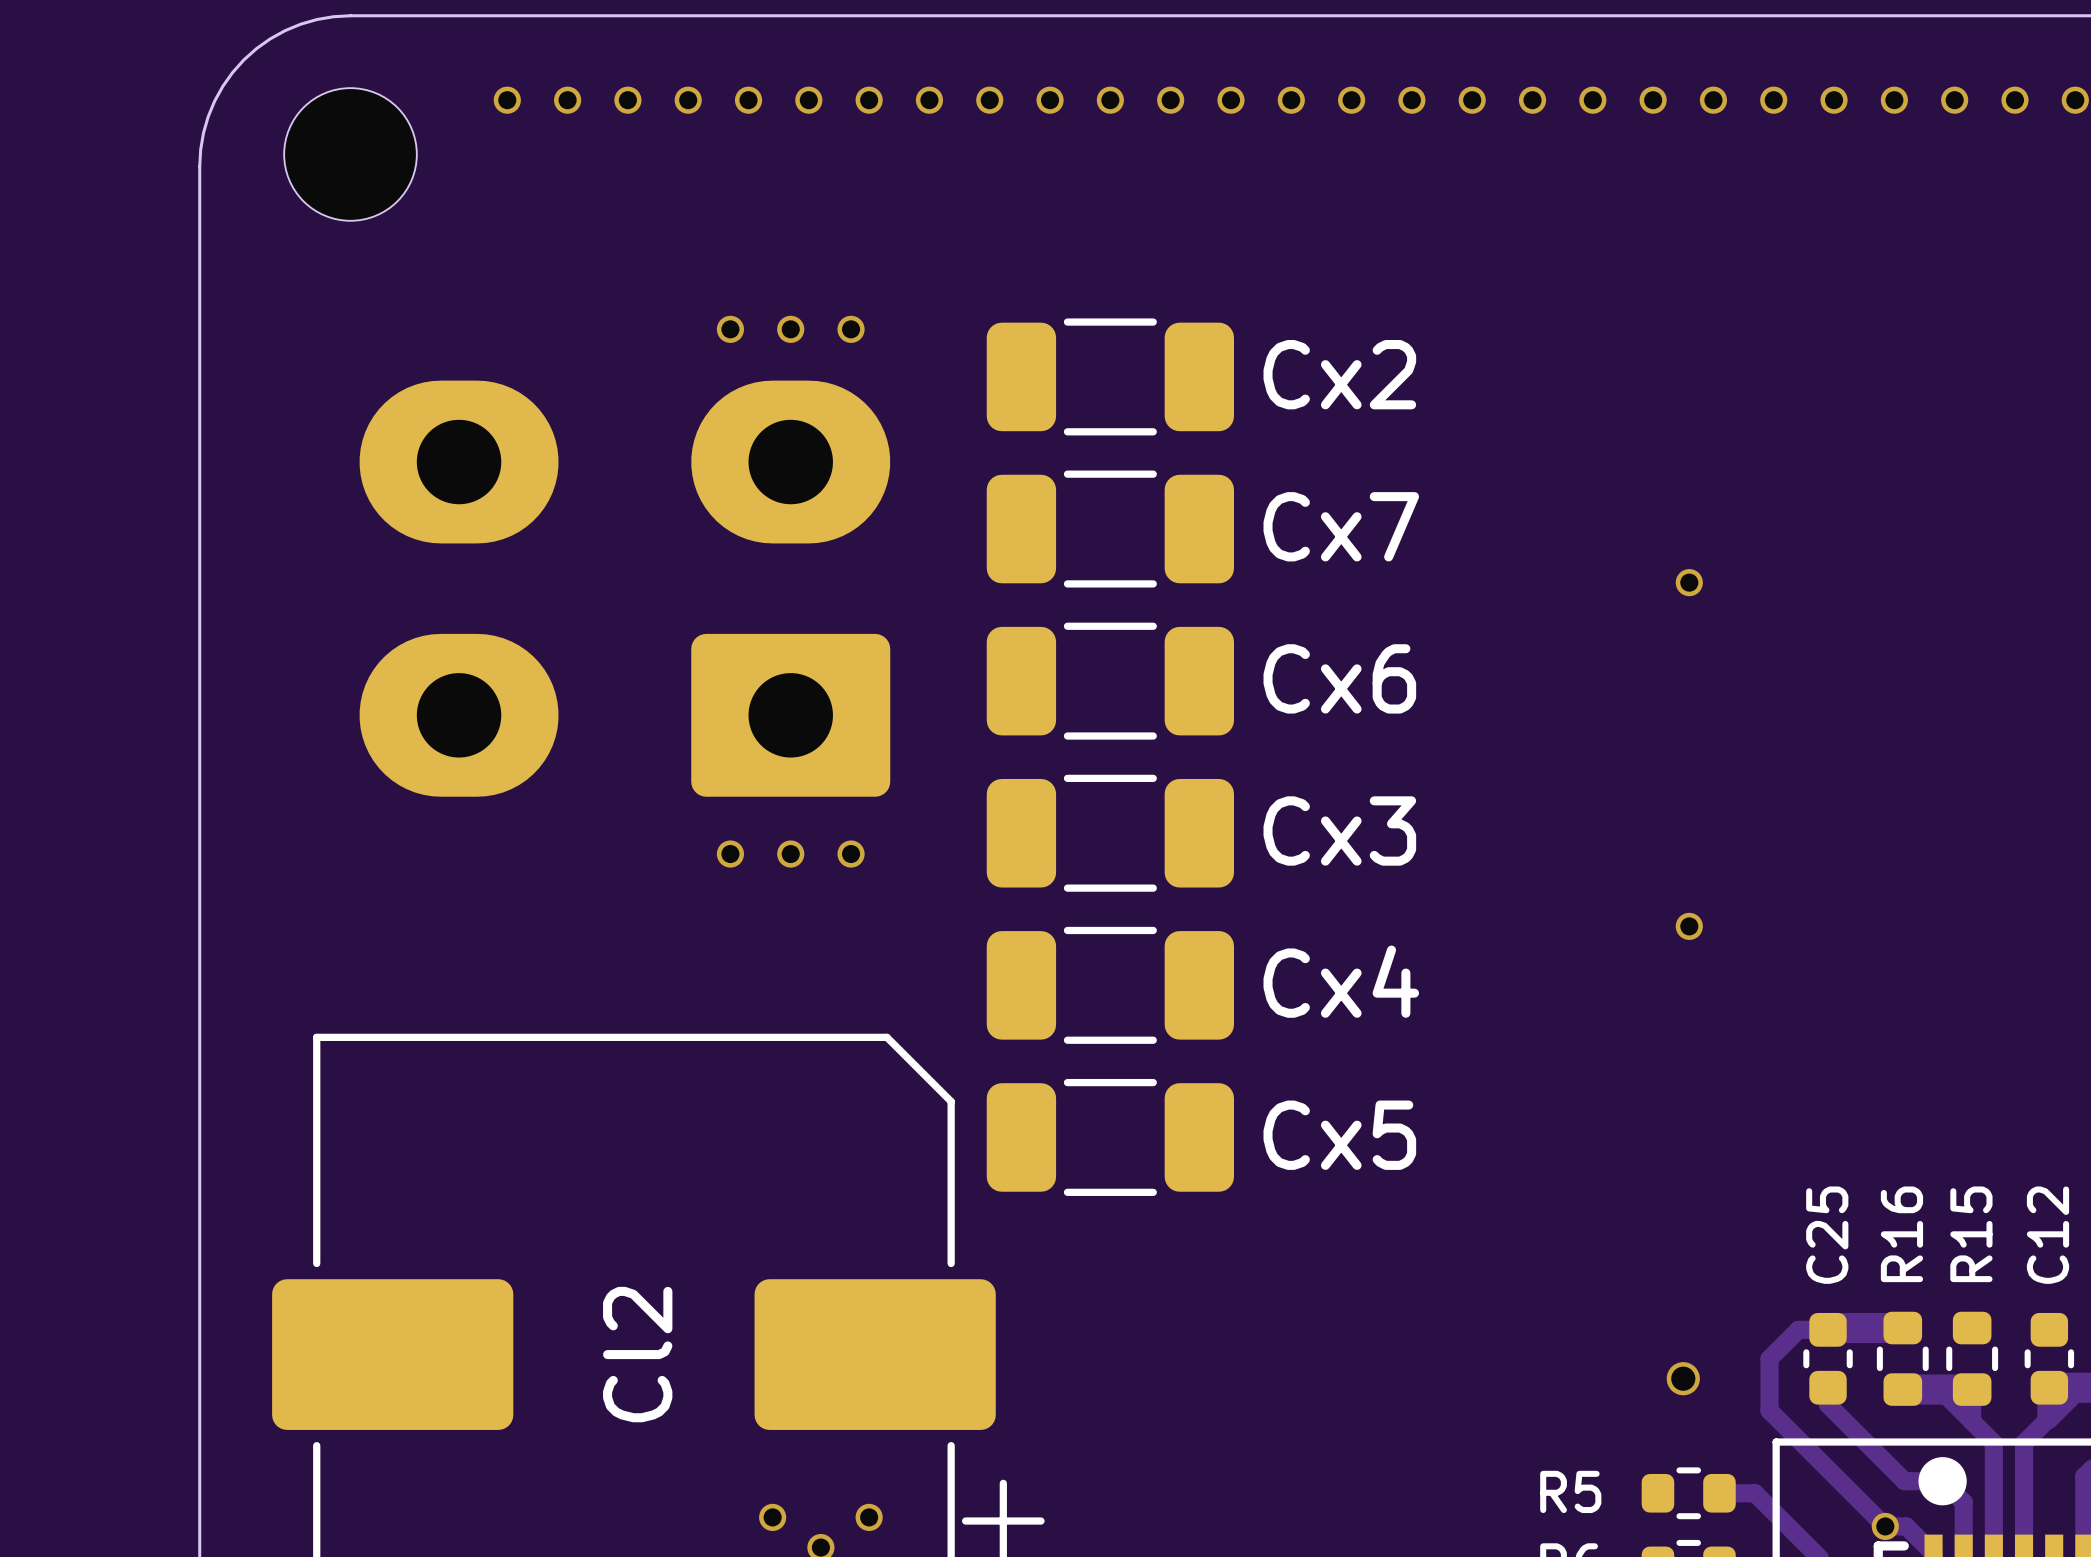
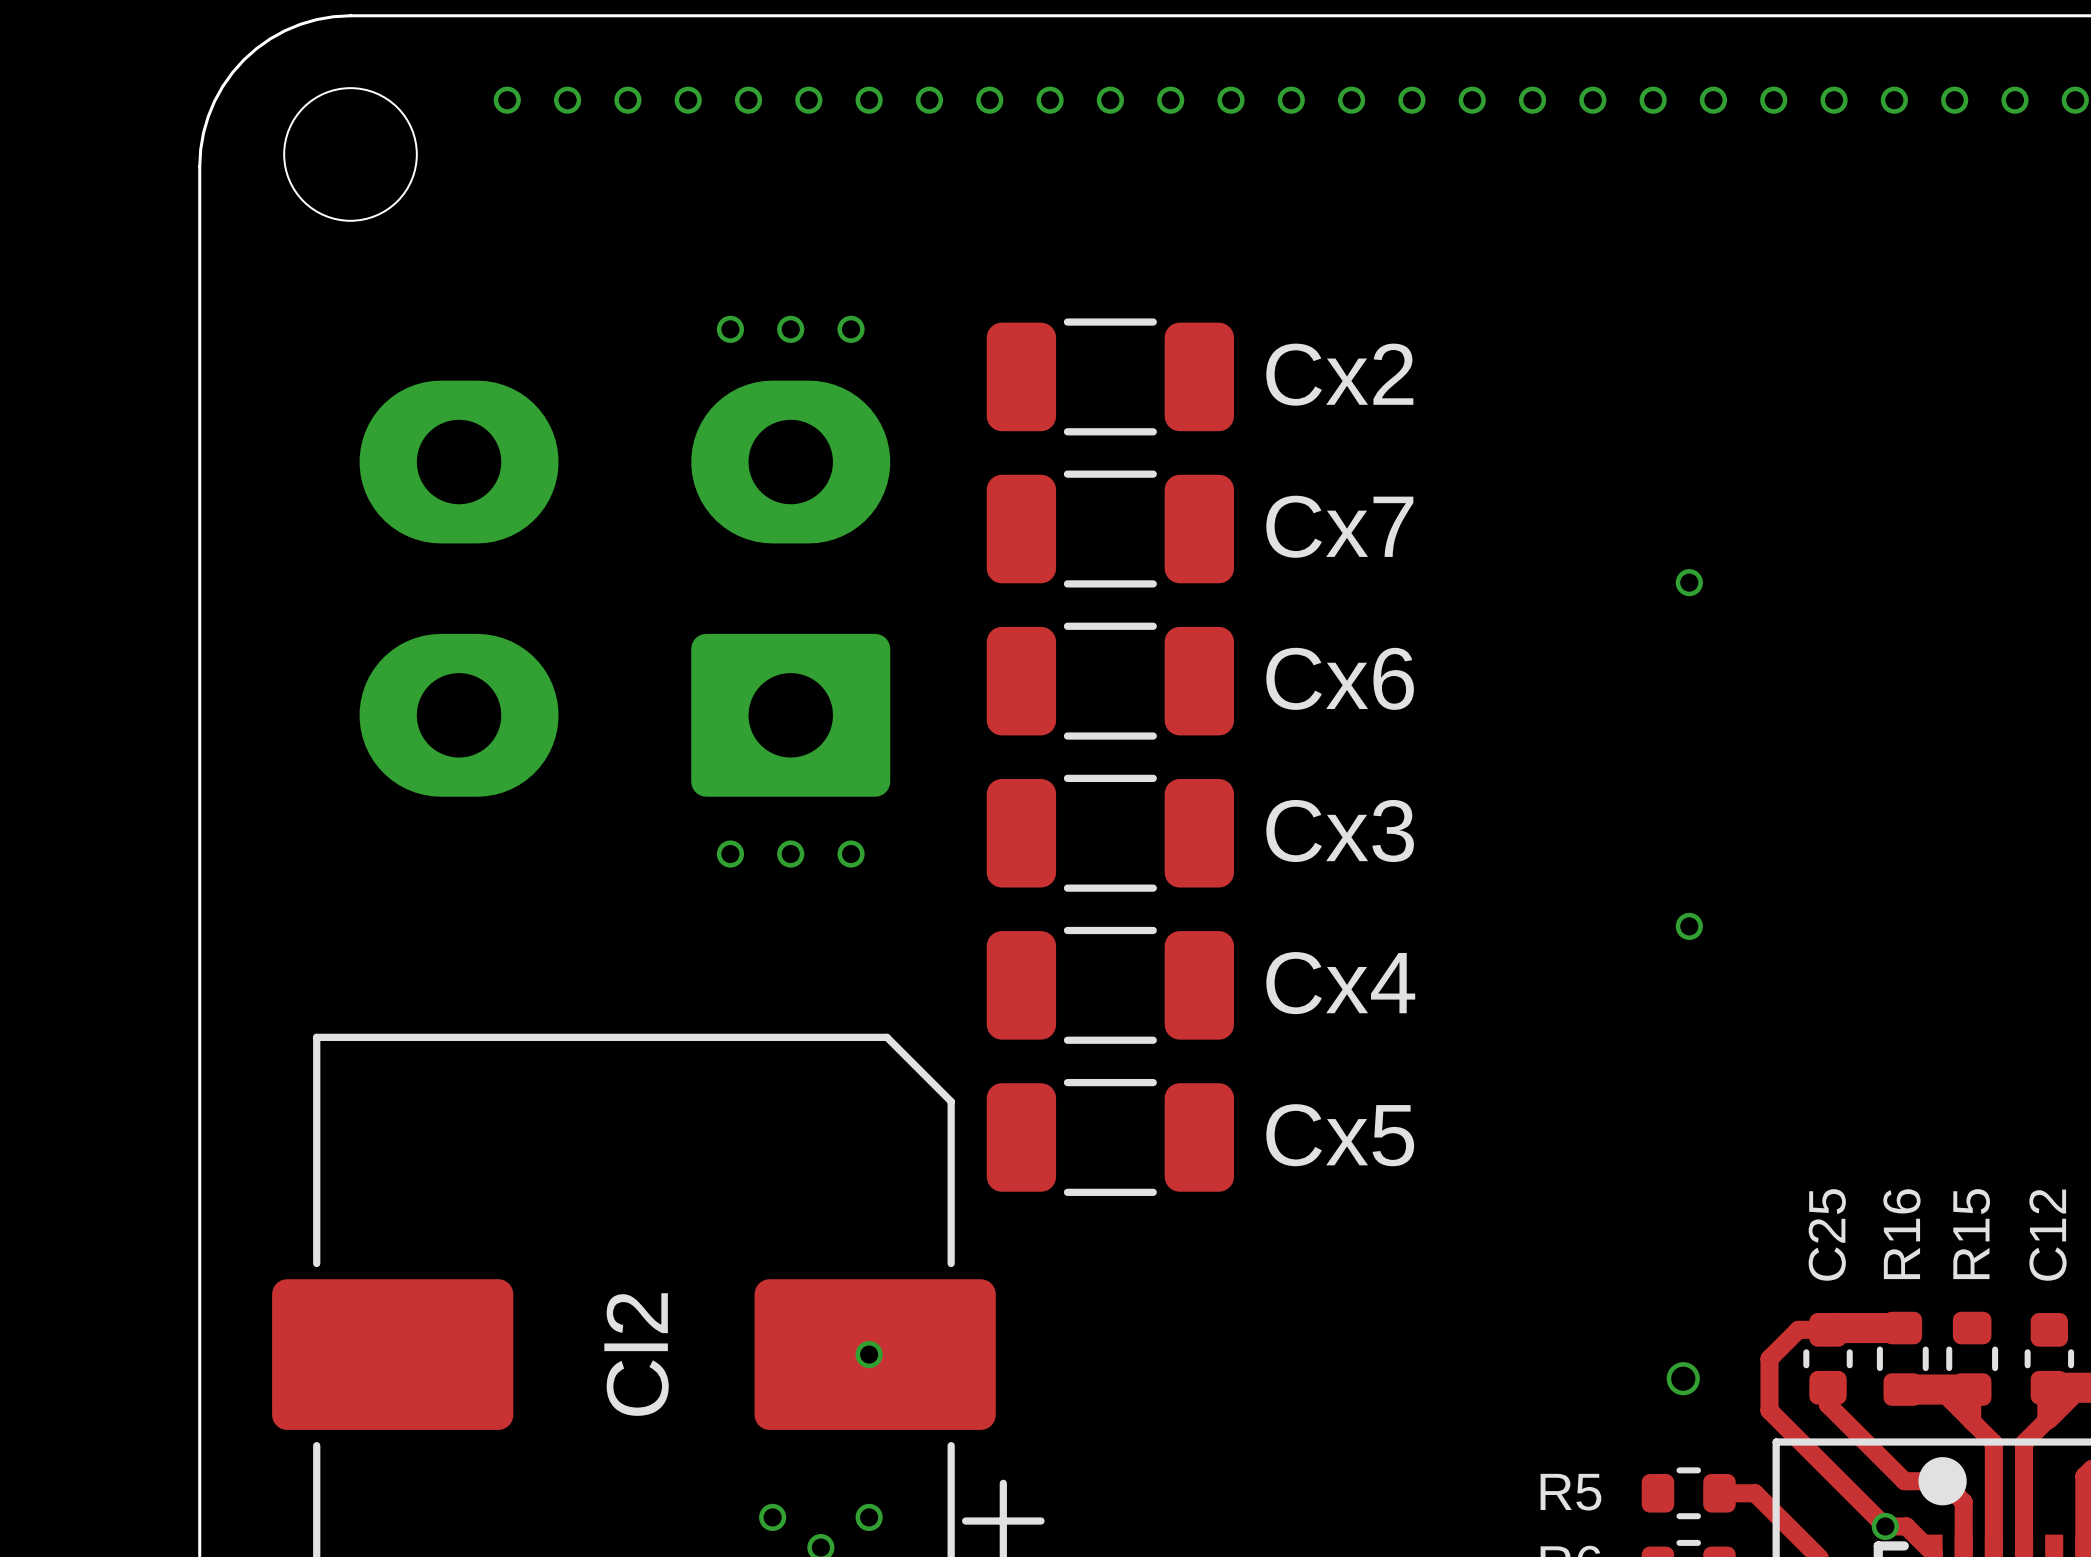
via: none -> (869, 1354)

